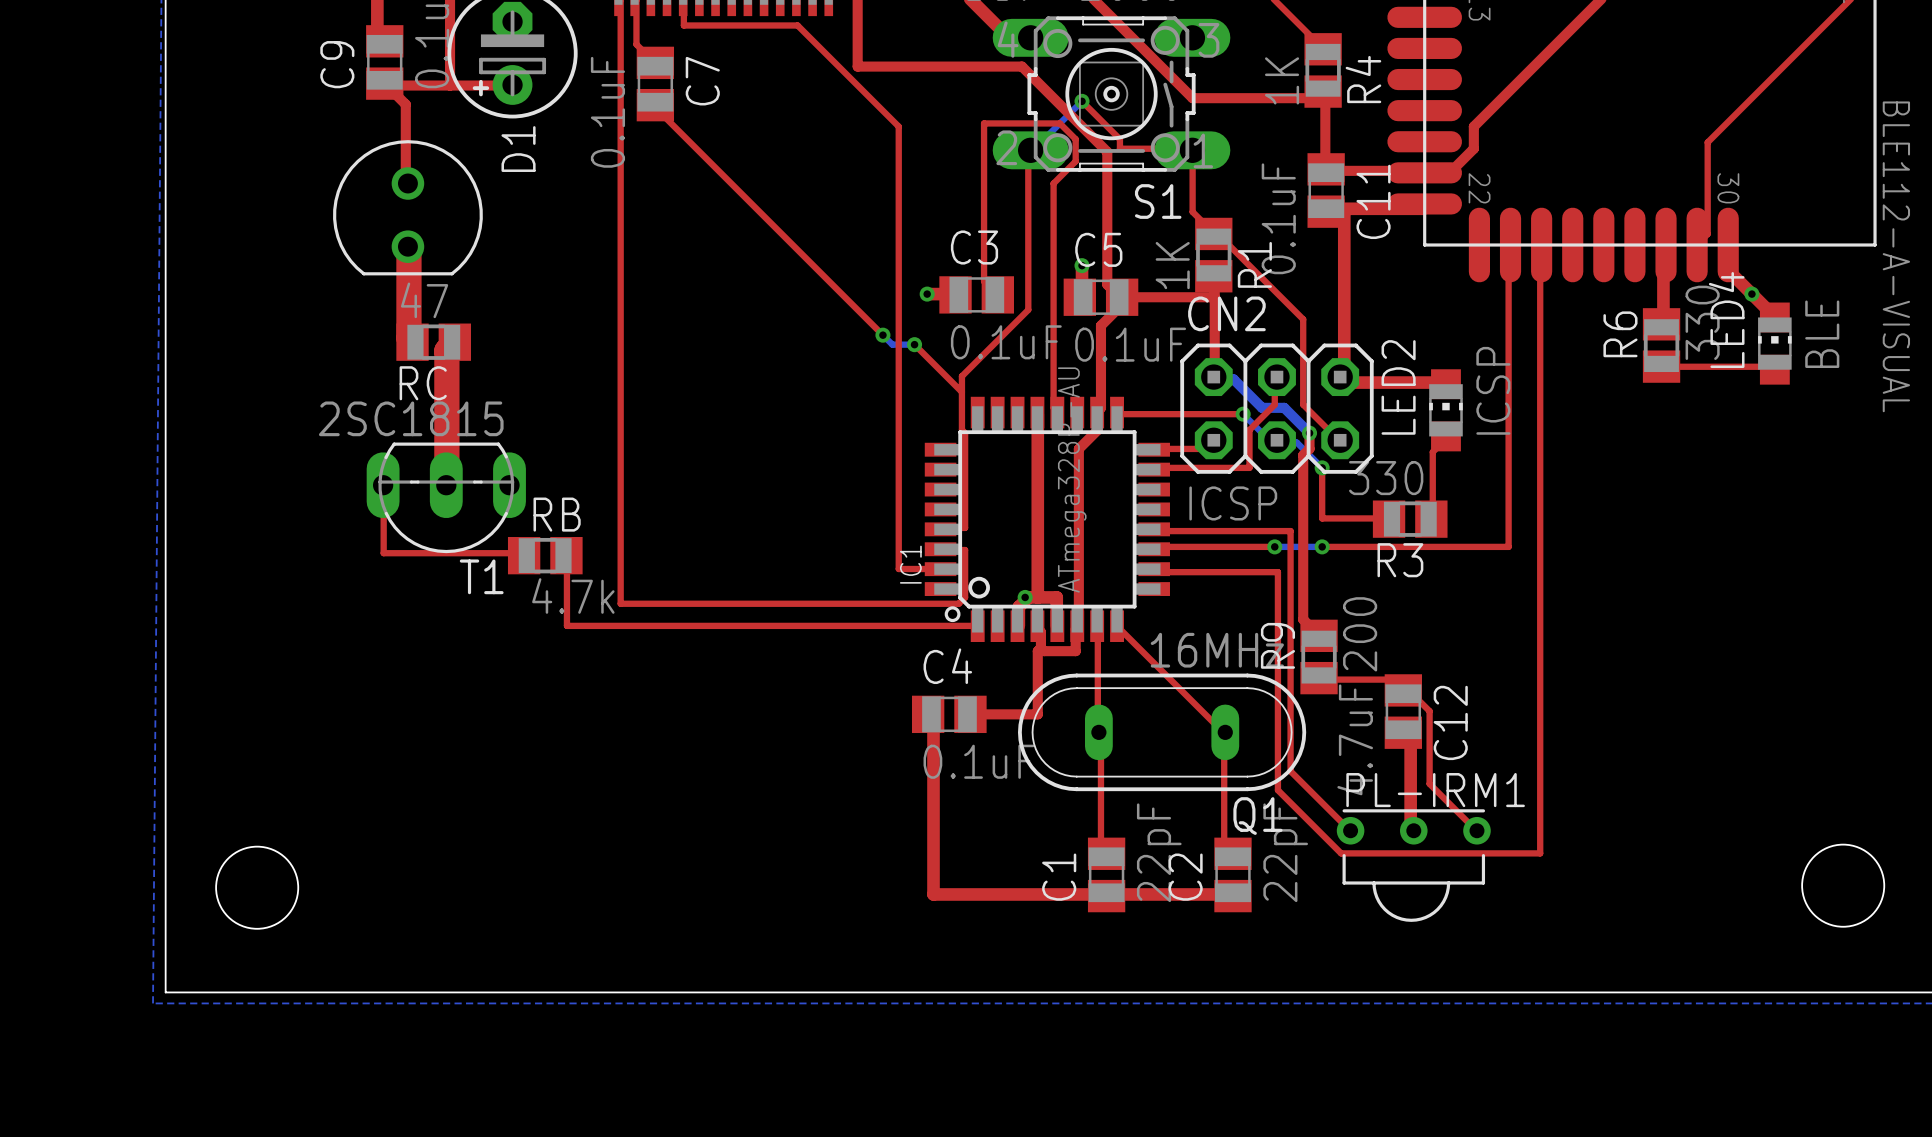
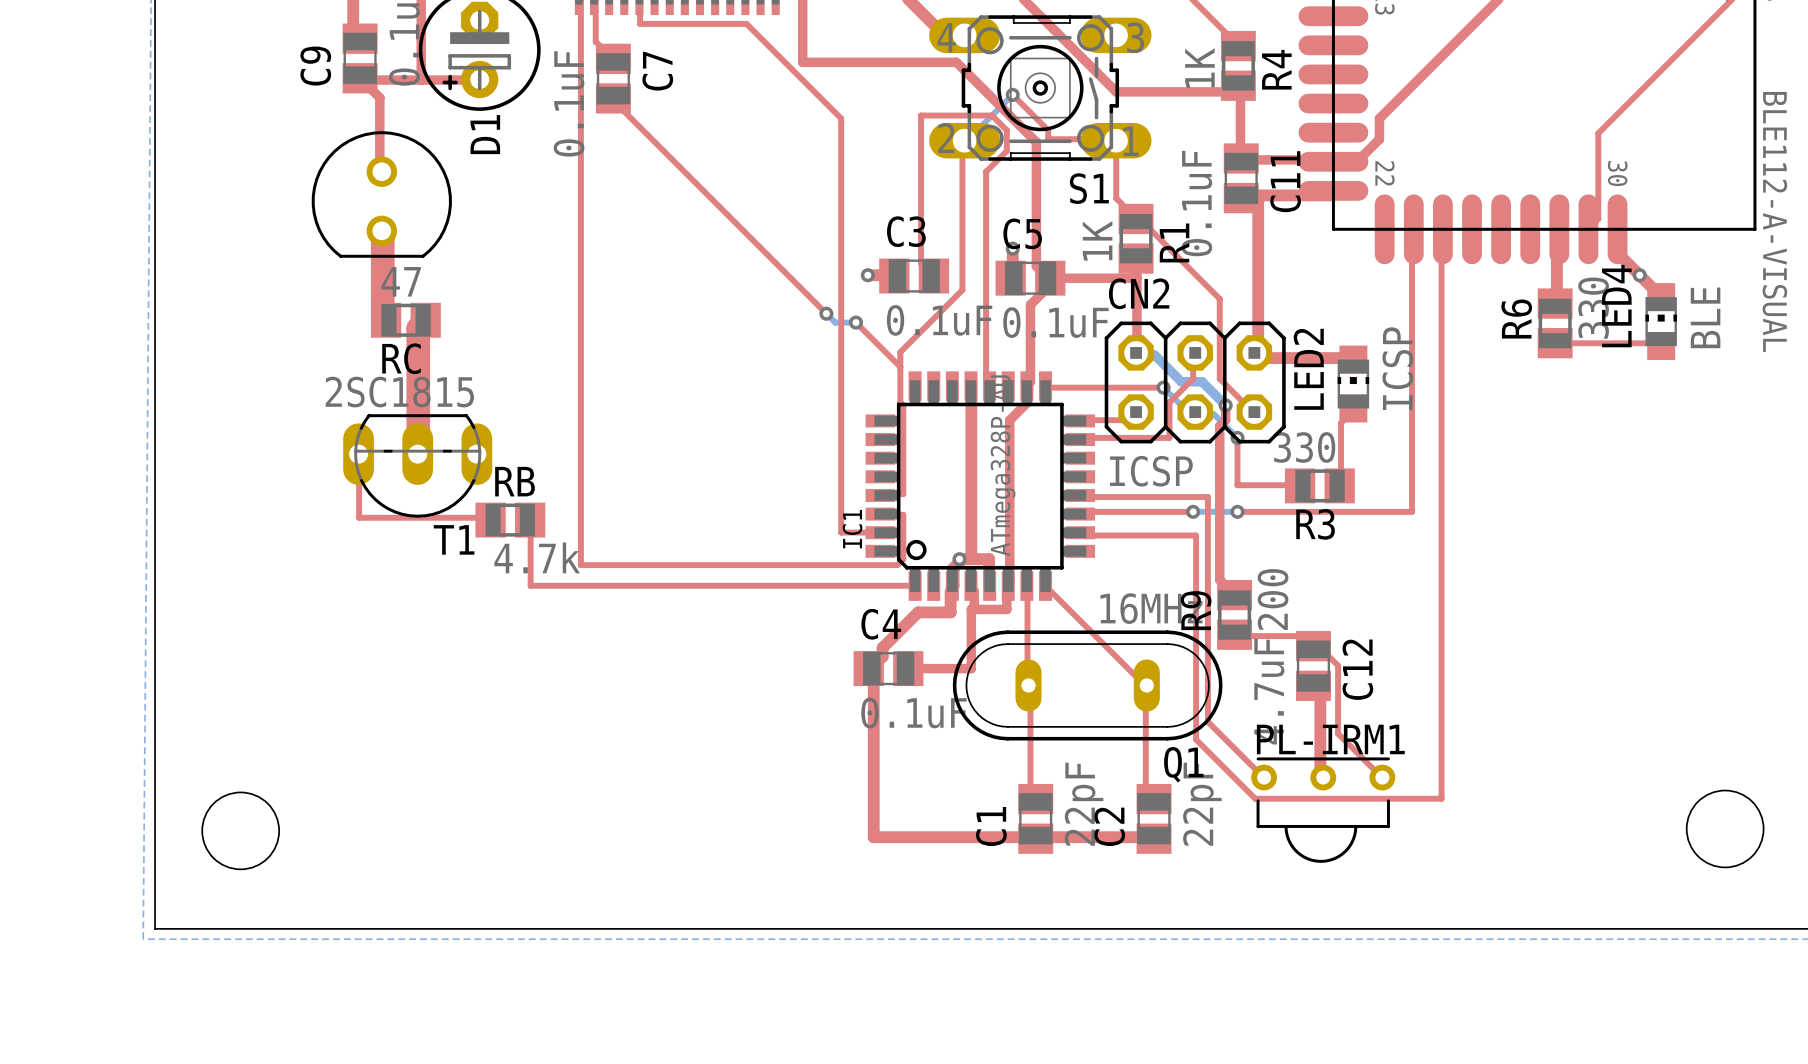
IC1 footprint: [924, 396, 1170, 642] -> [865, 371, 1096, 601]
top track: none -> (953, 585) (950, 591) (950, 612) (918, 612) (882, 647) (882, 656) (868, 668) (873, 671)

